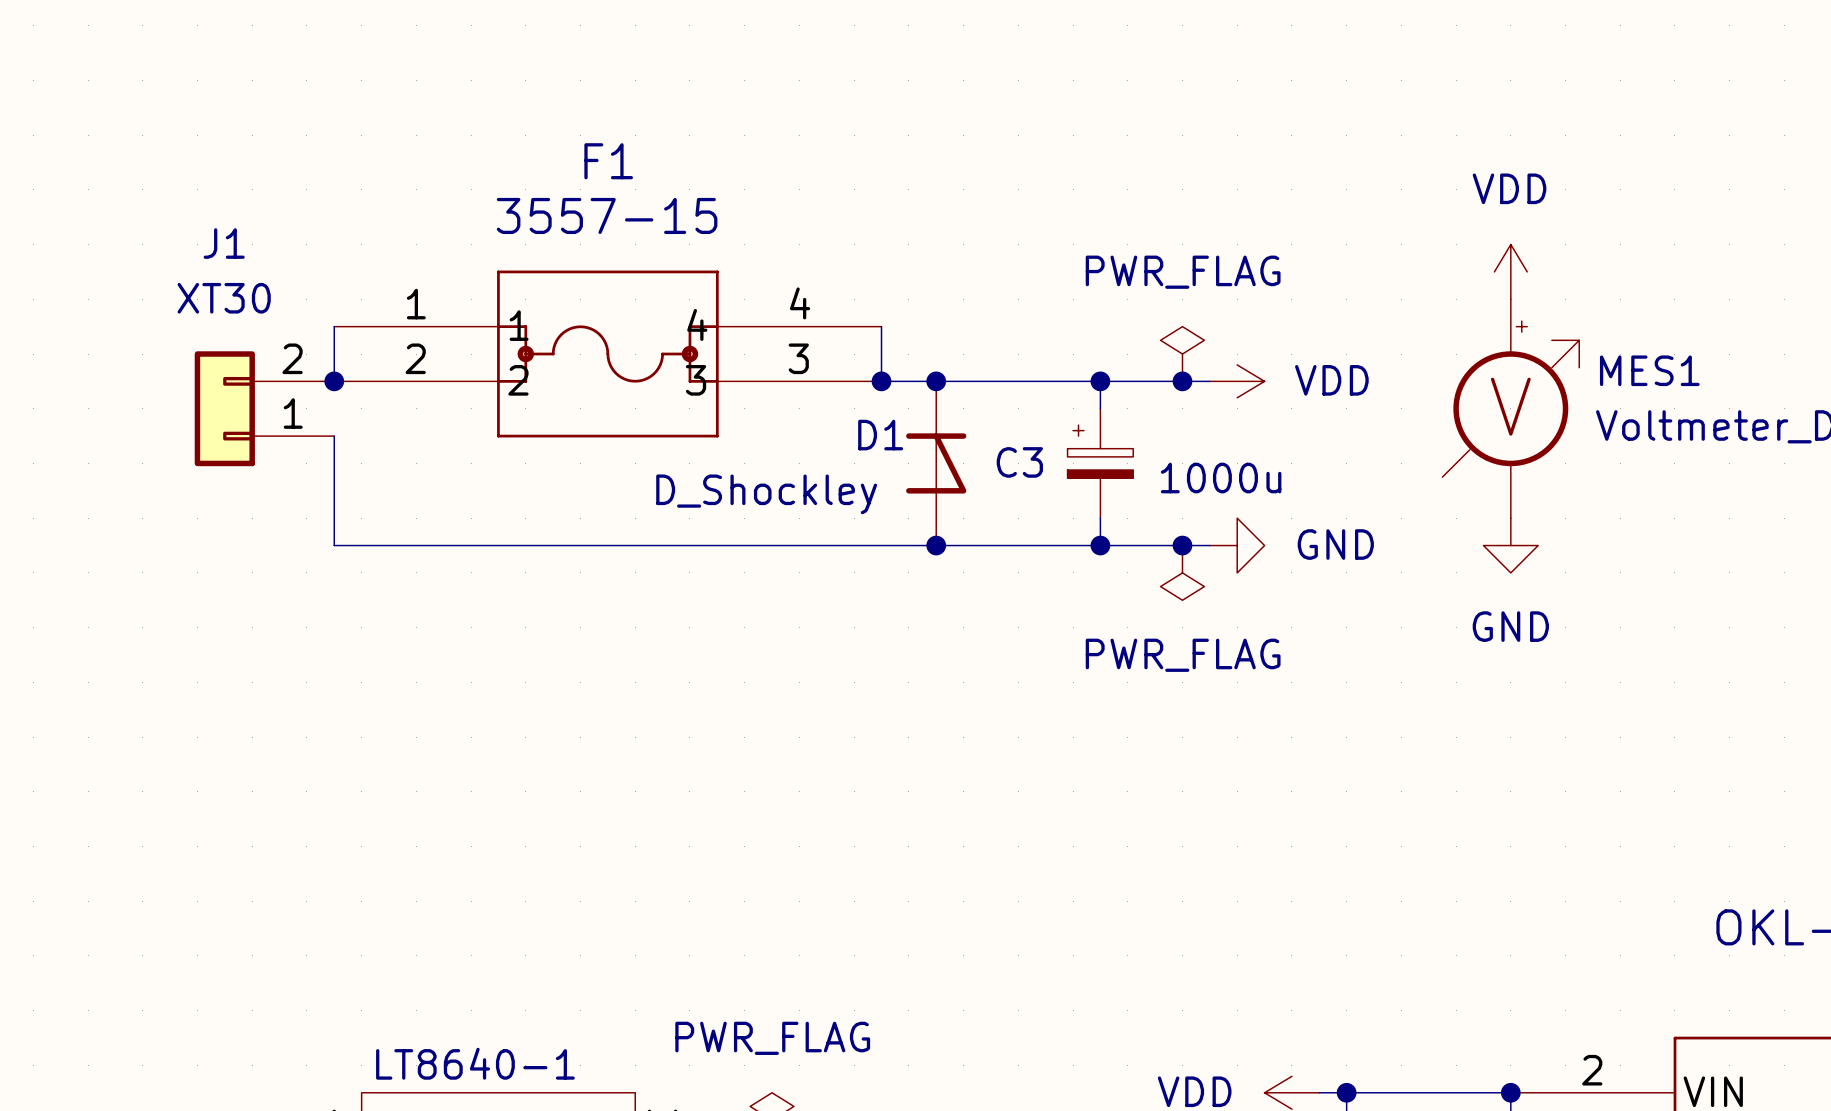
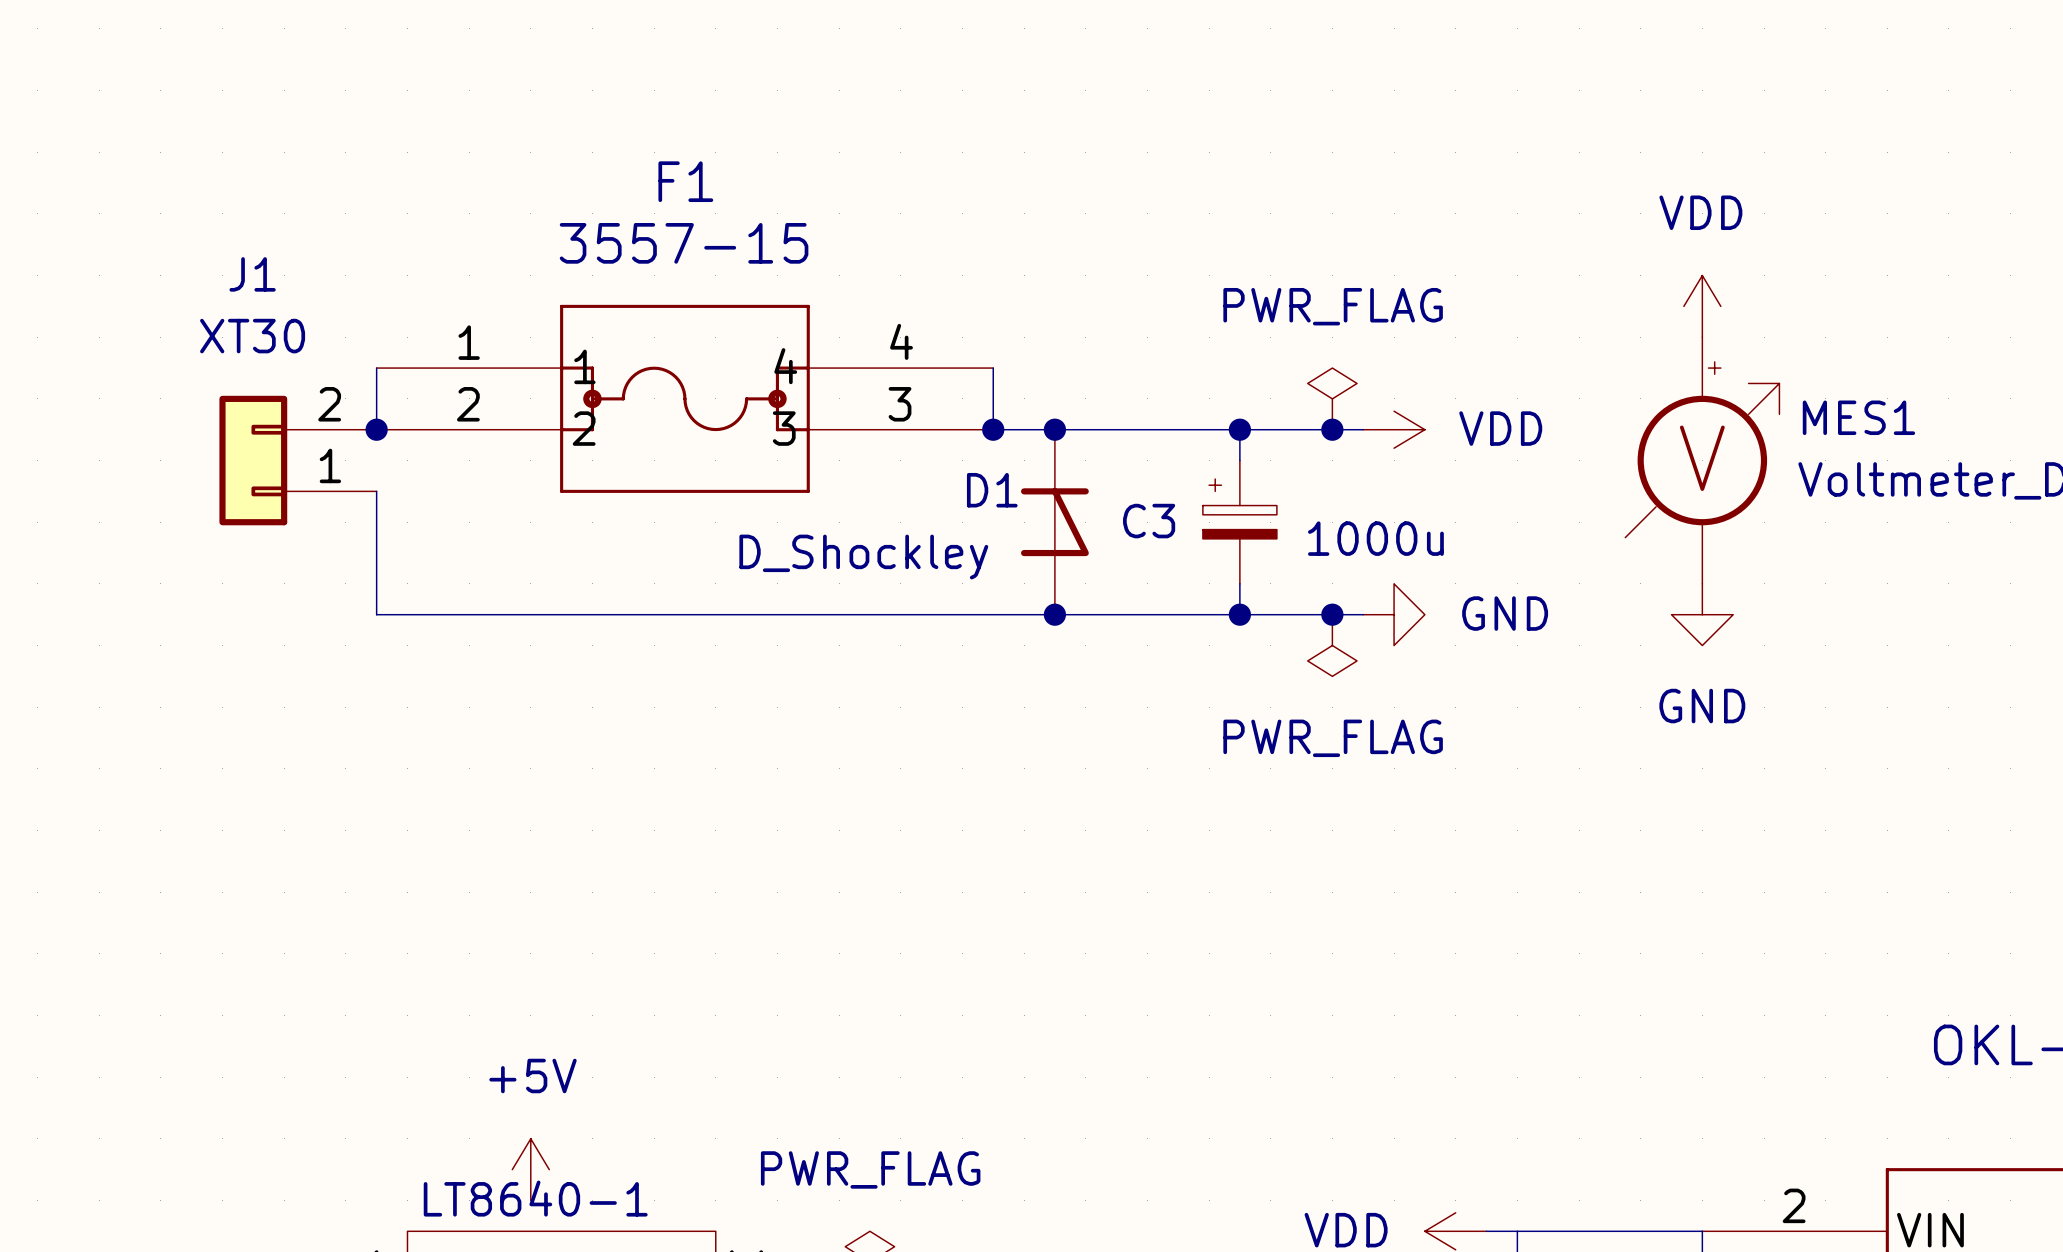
power symbol: none -> +5V (530, 1169)
junction: (1346, 1092) -> none
junction: (1510, 1092) -> none

